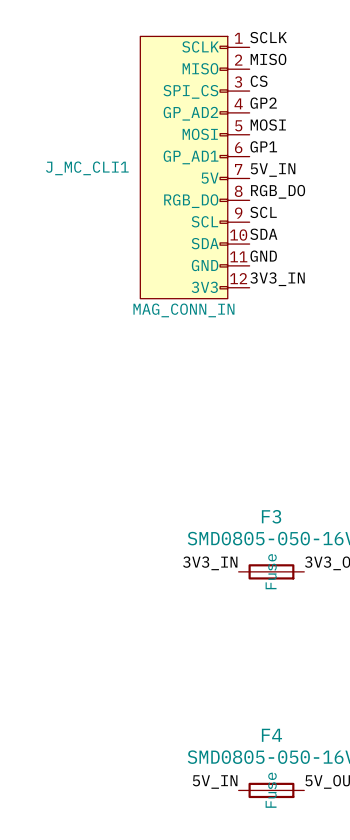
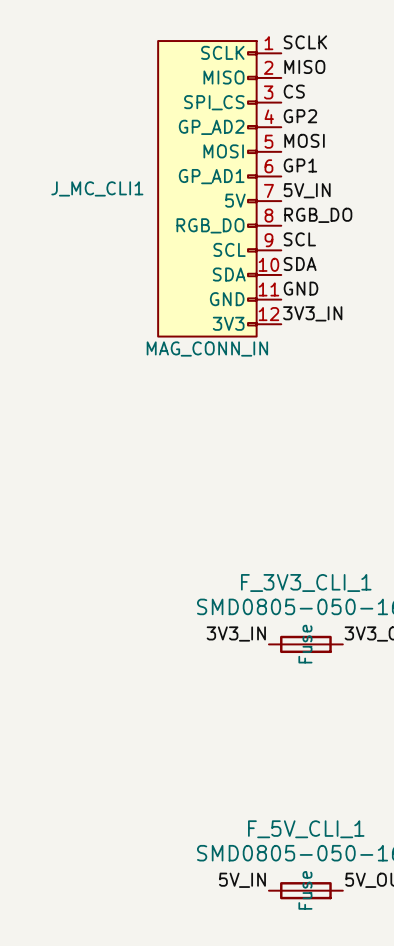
F3 name: F3 (271, 516) -> F_3V3_CLI_1 (306, 582)
F4 name: F4 (271, 735) -> F_5V_CLI_1 (306, 829)

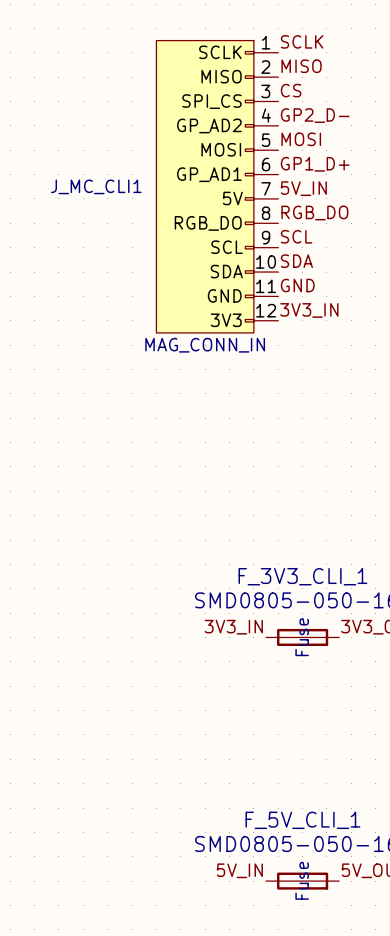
label: GP2 (300, 116) -> GP2_D- (315, 115)
label: GP1 (300, 165) -> GP1_D+ (315, 164)

